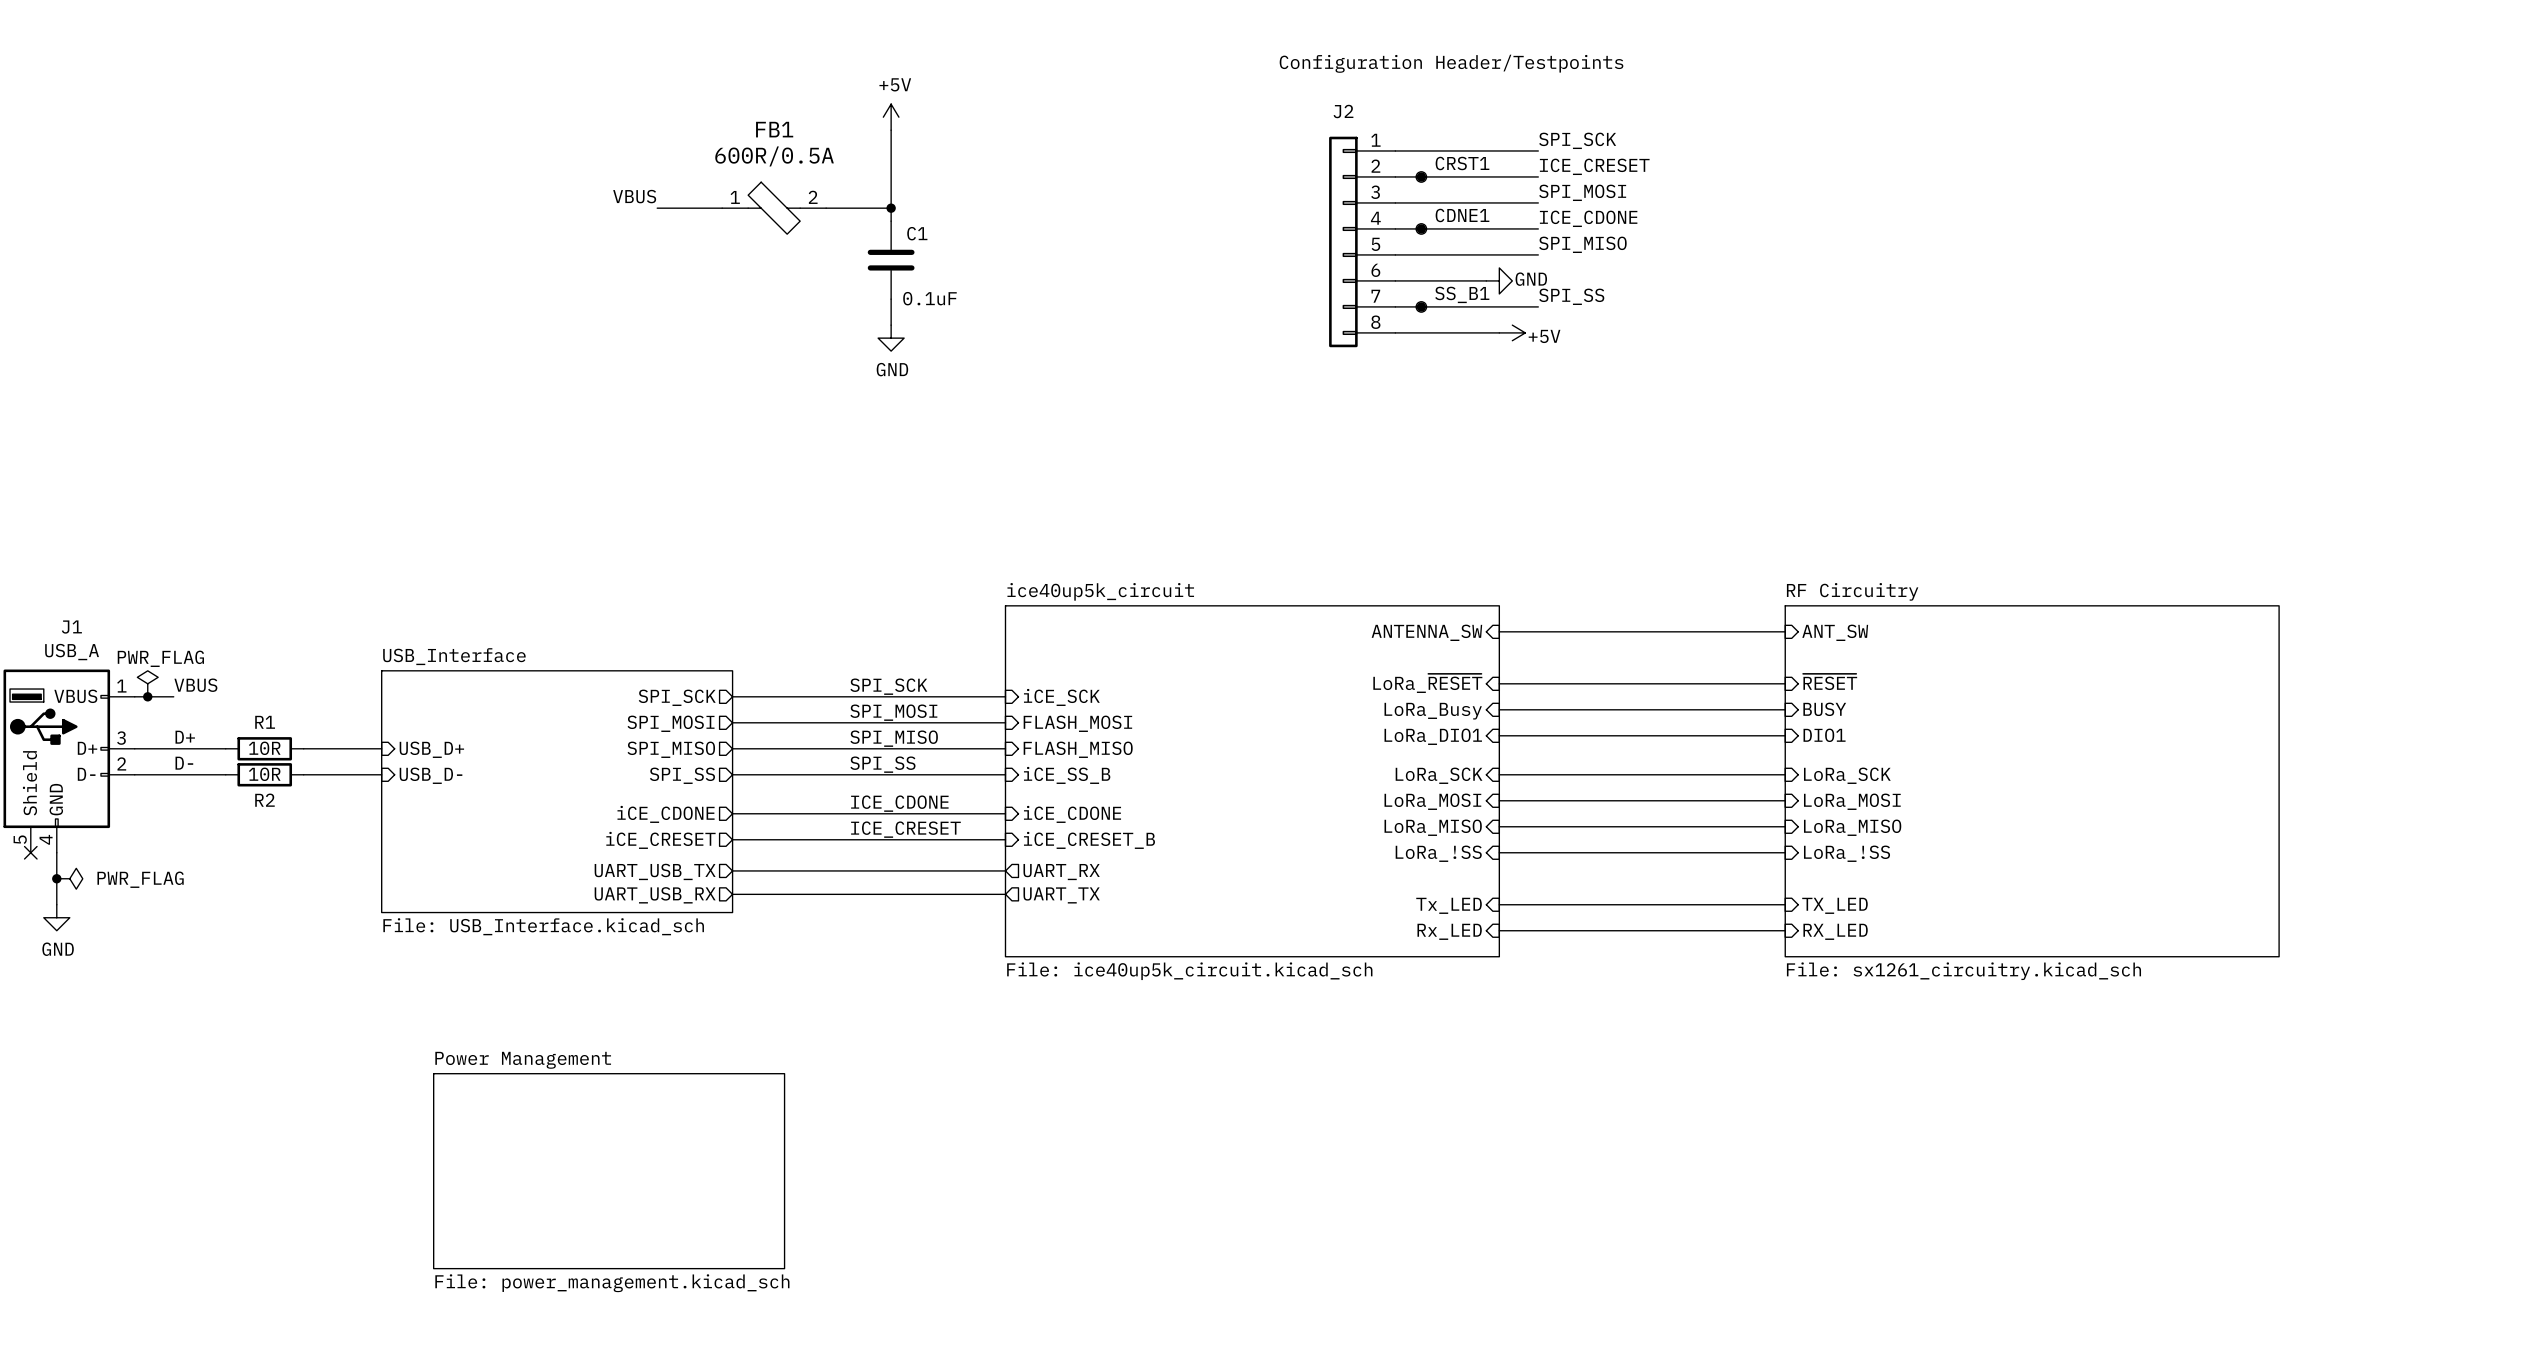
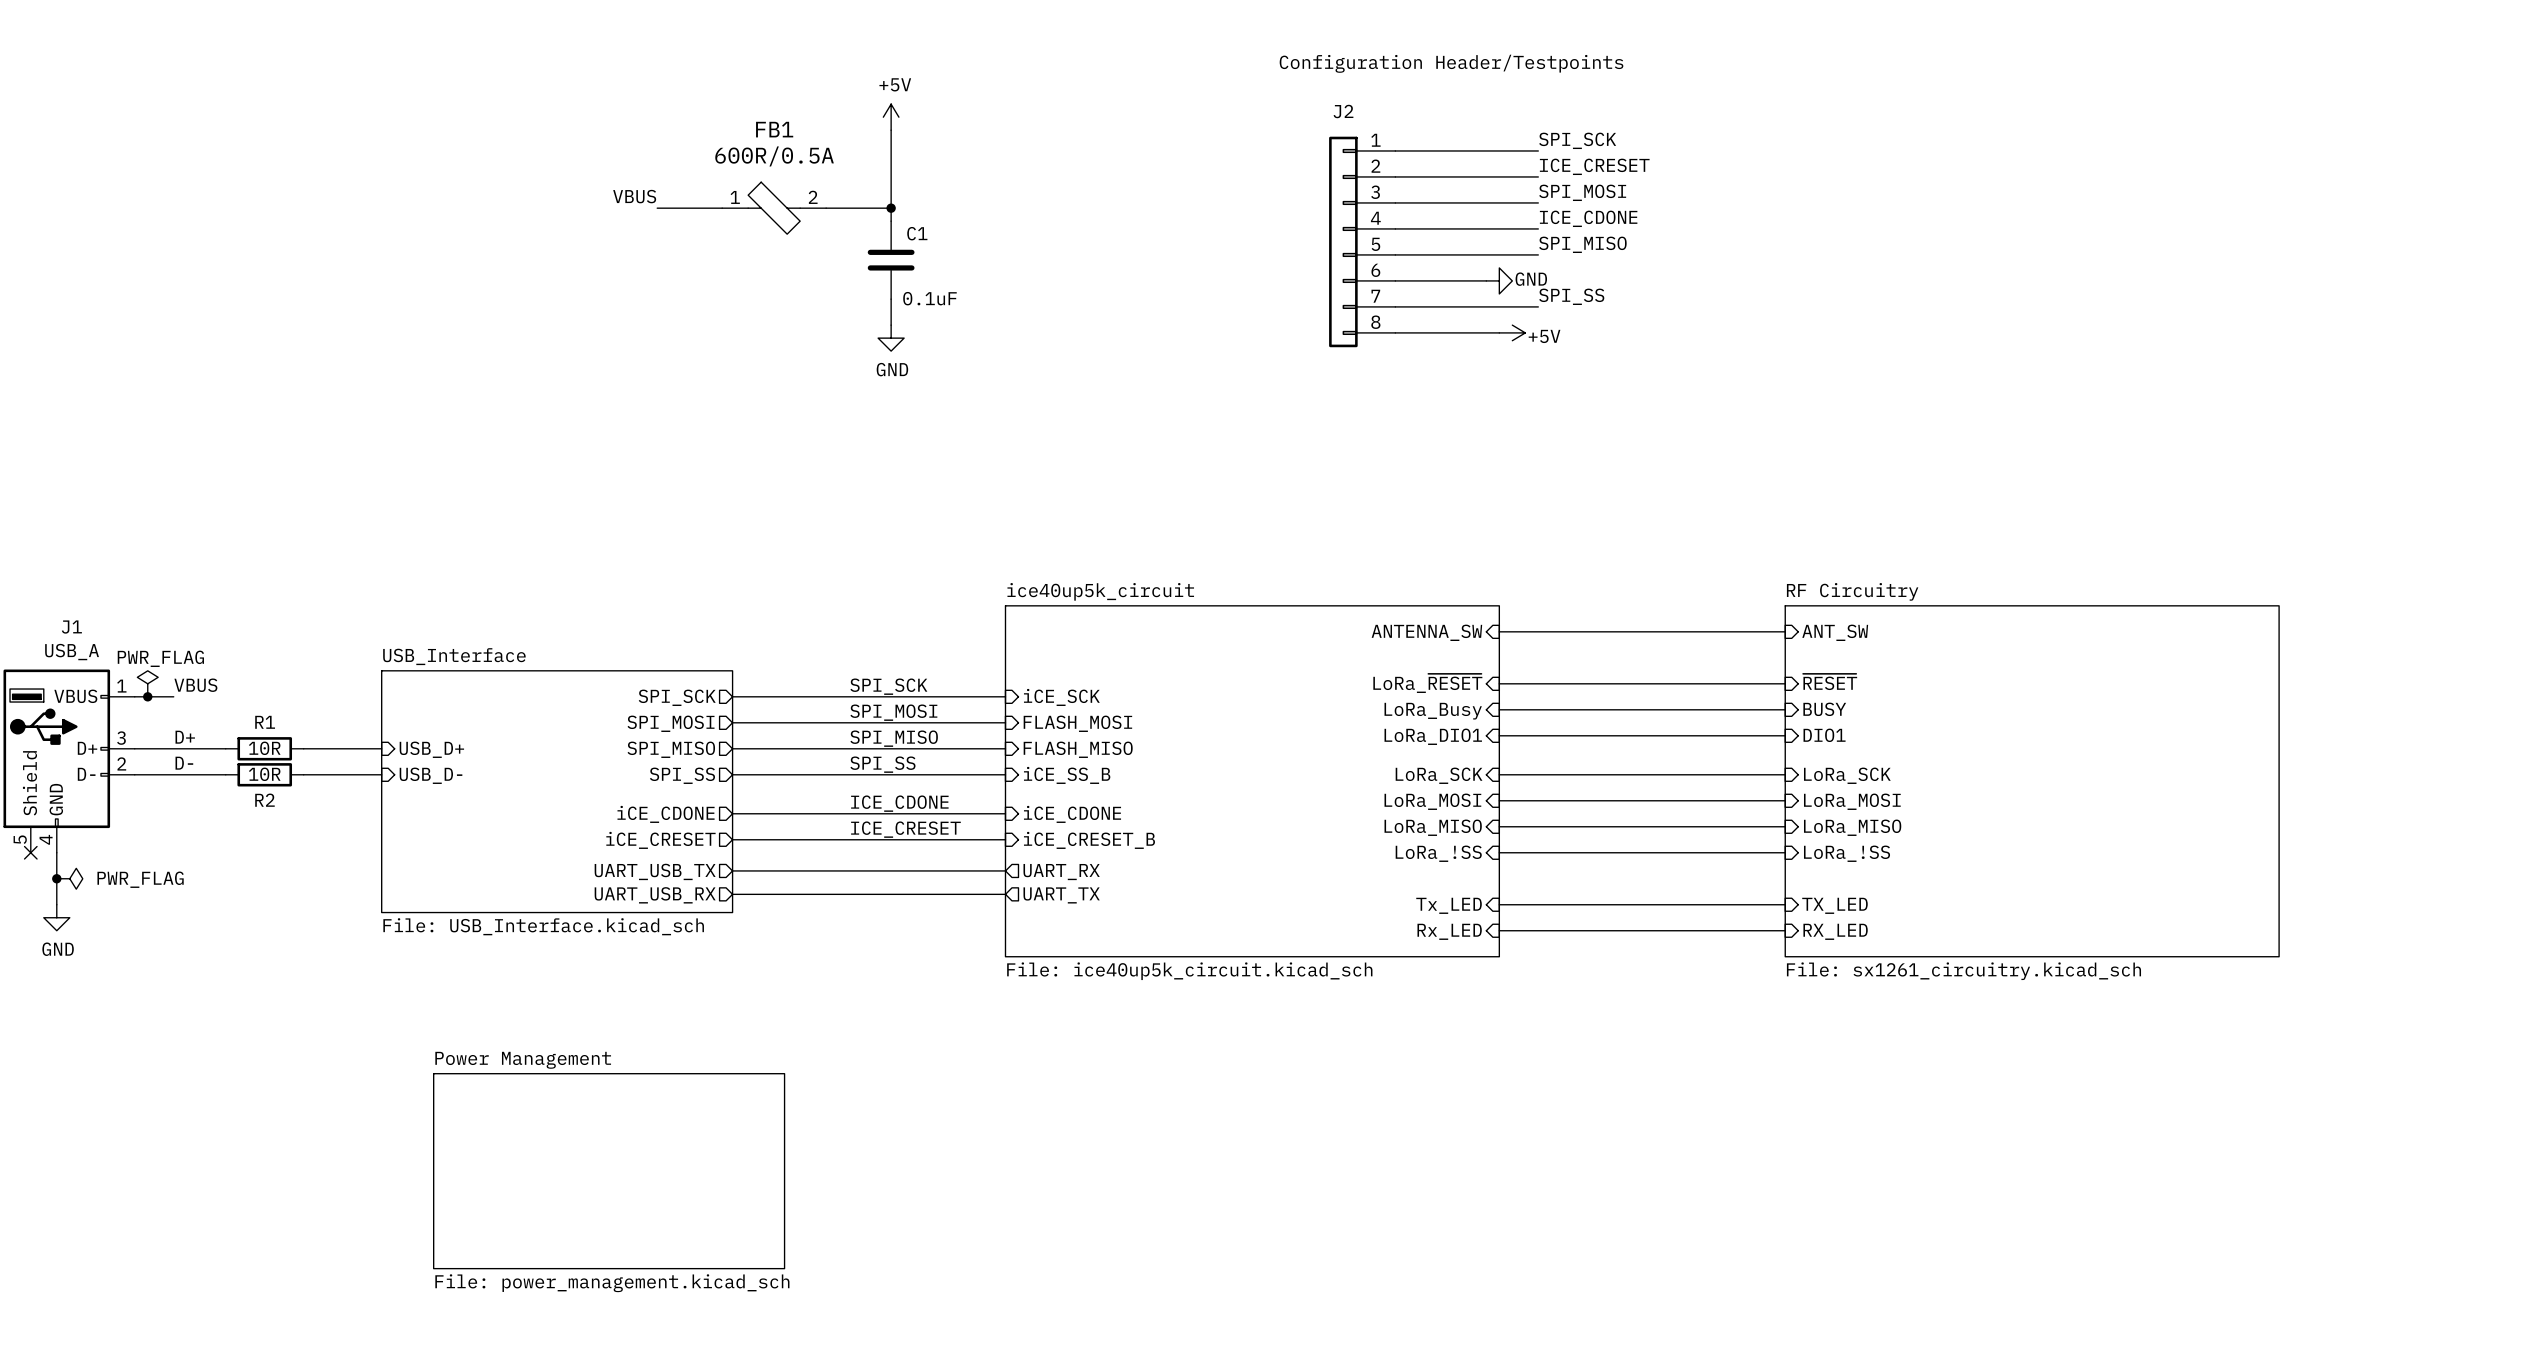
junction: (1421, 176) -> none
CRST1: (1421, 176) -> none
junction: (1421, 228) -> none
CDNE1: (1421, 228) -> none
junction: (1421, 306) -> none
SS_B1: (1421, 306) -> none

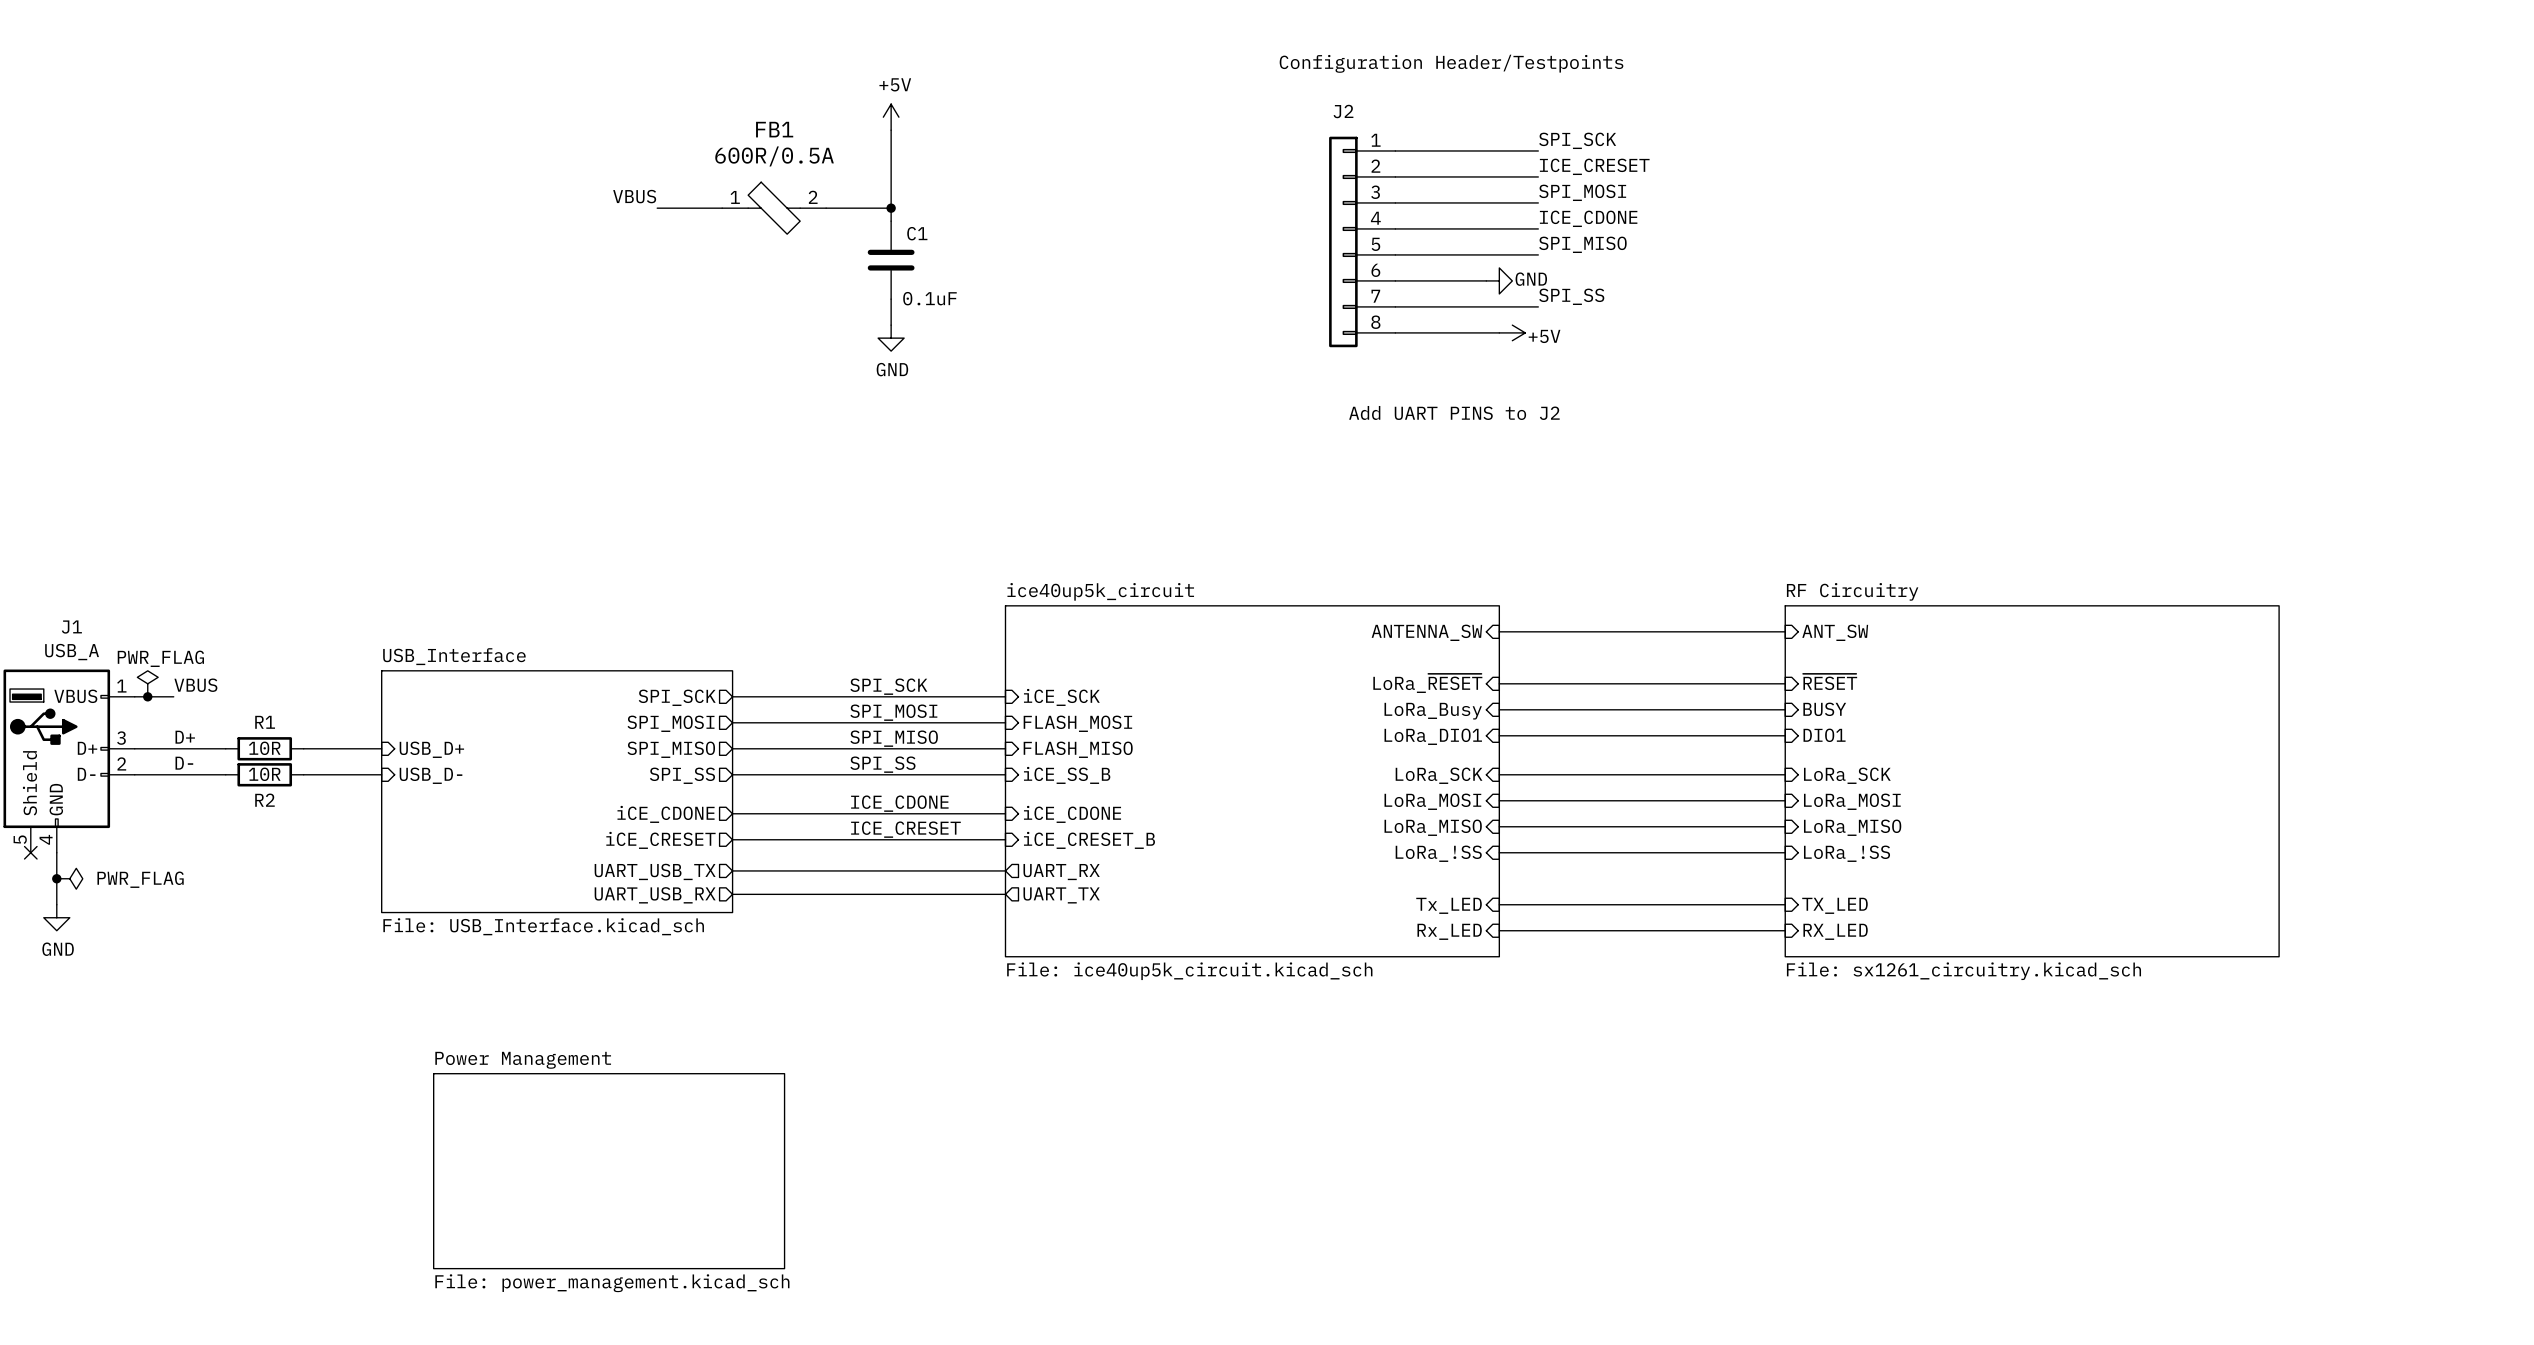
text: none -> Add UART PINS to J2 (1454, 412)

